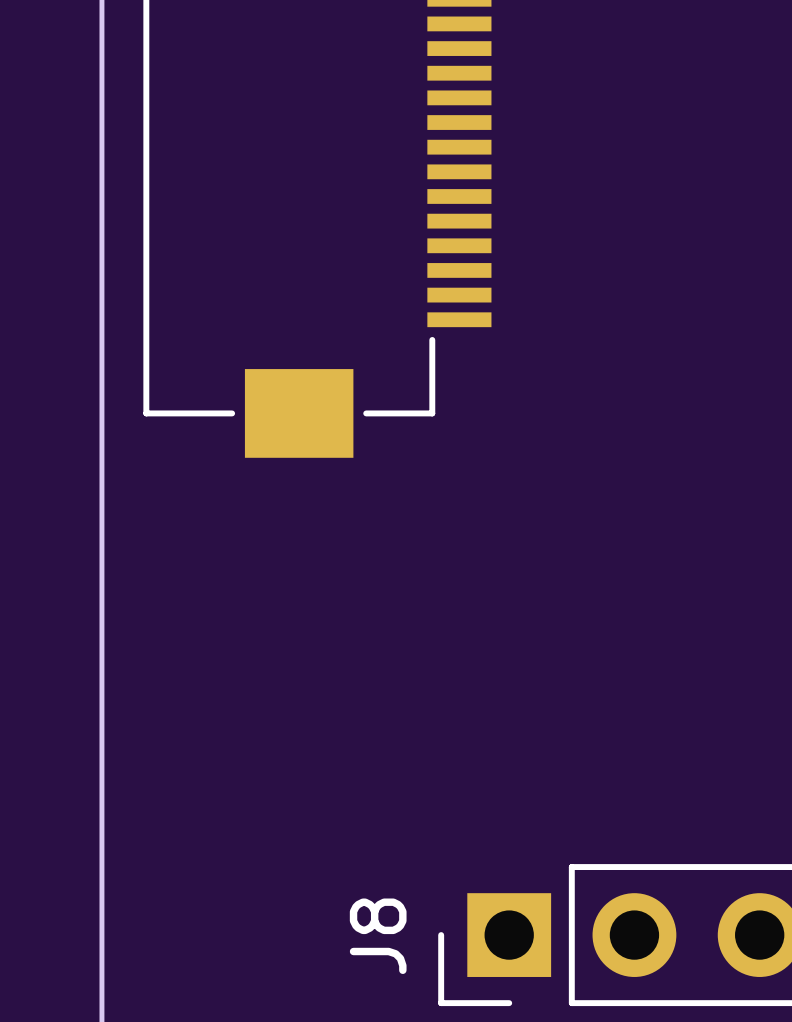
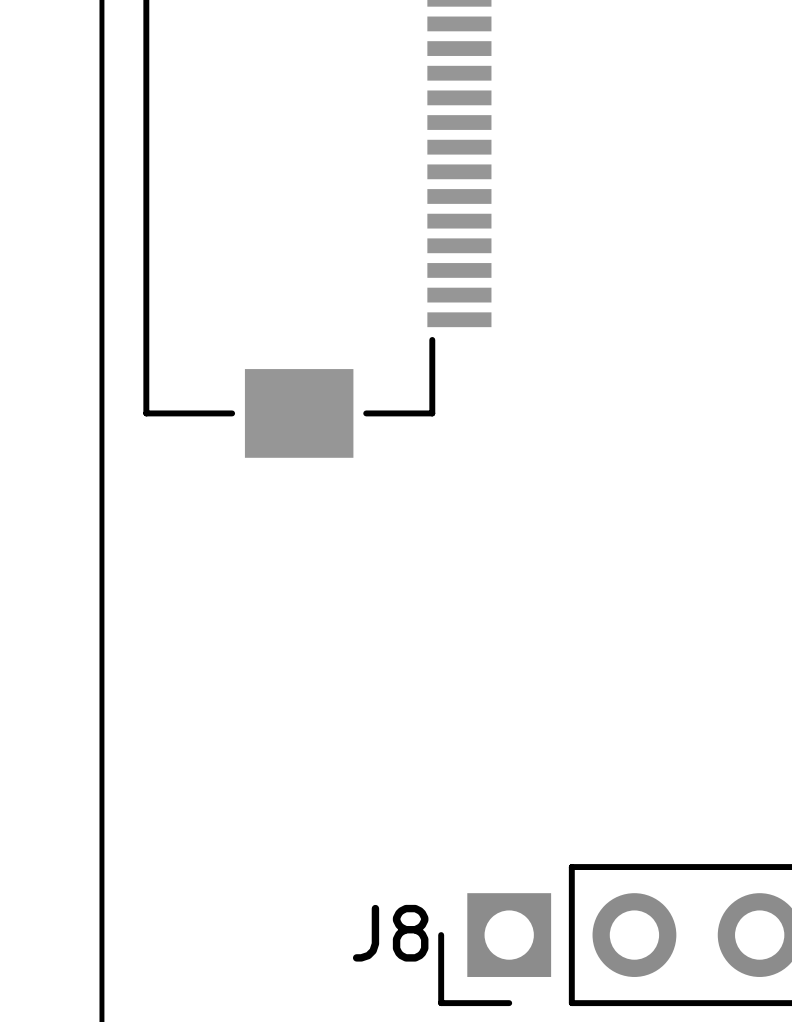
J8 name rotation: 0° (378, 936) -> 90° clockwise (390, 933)

